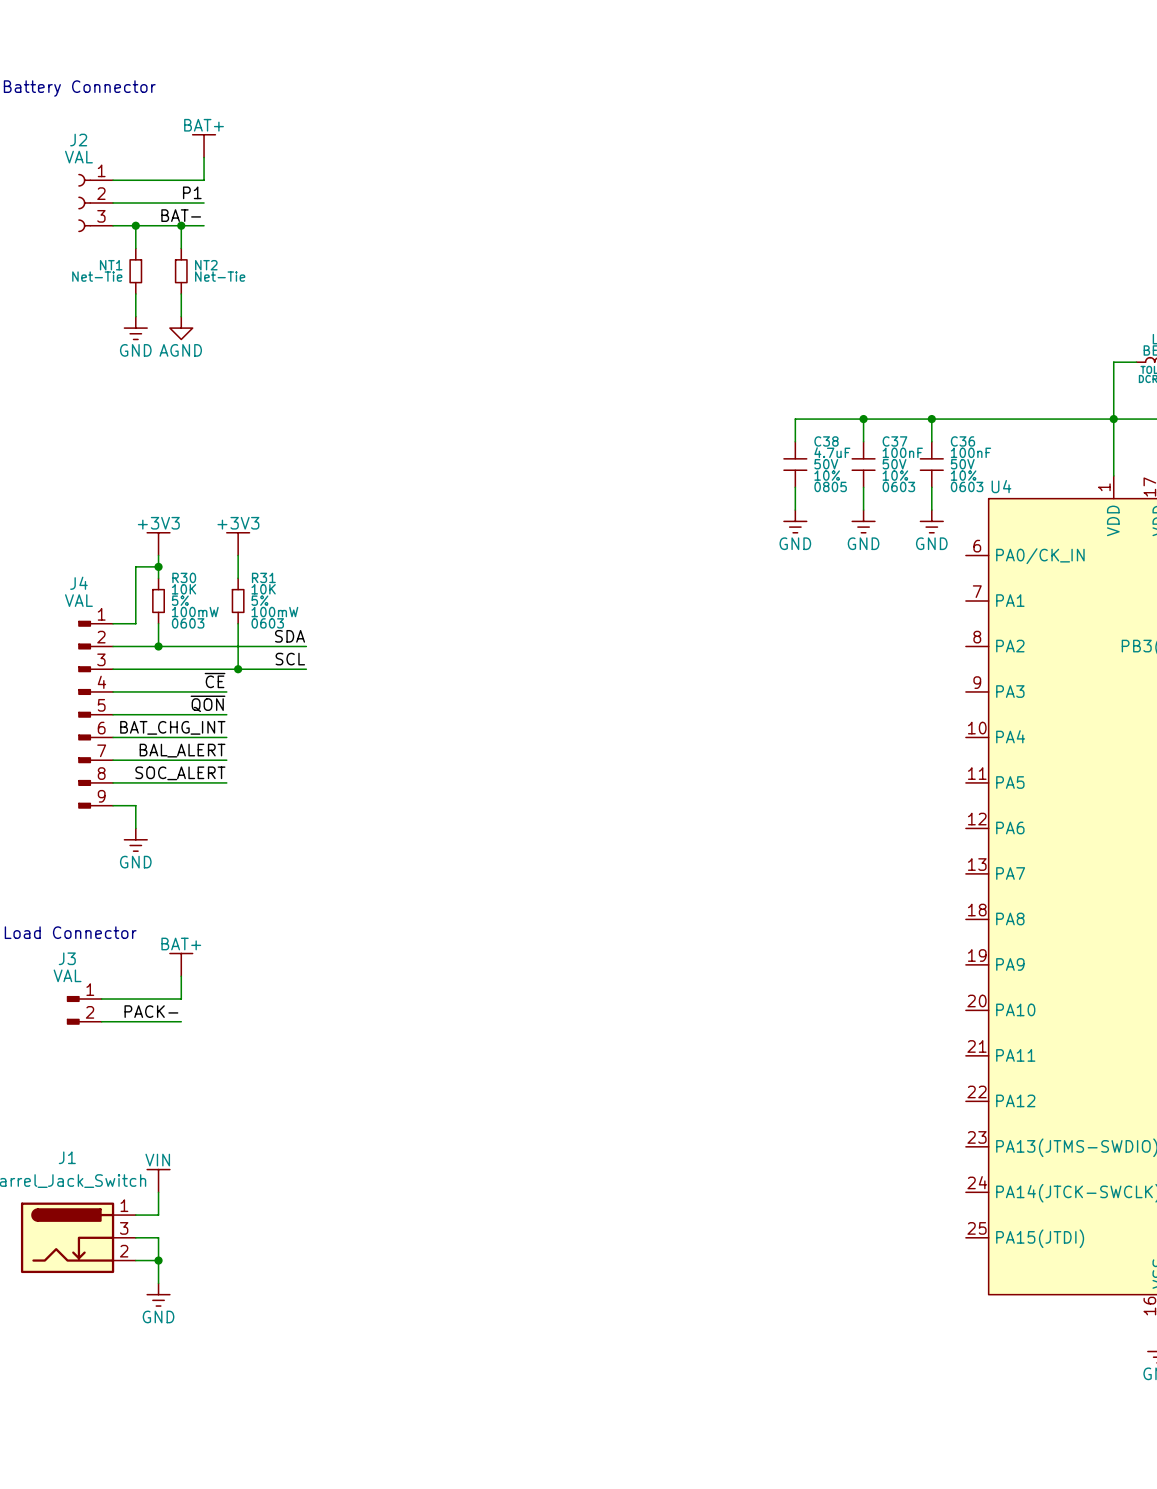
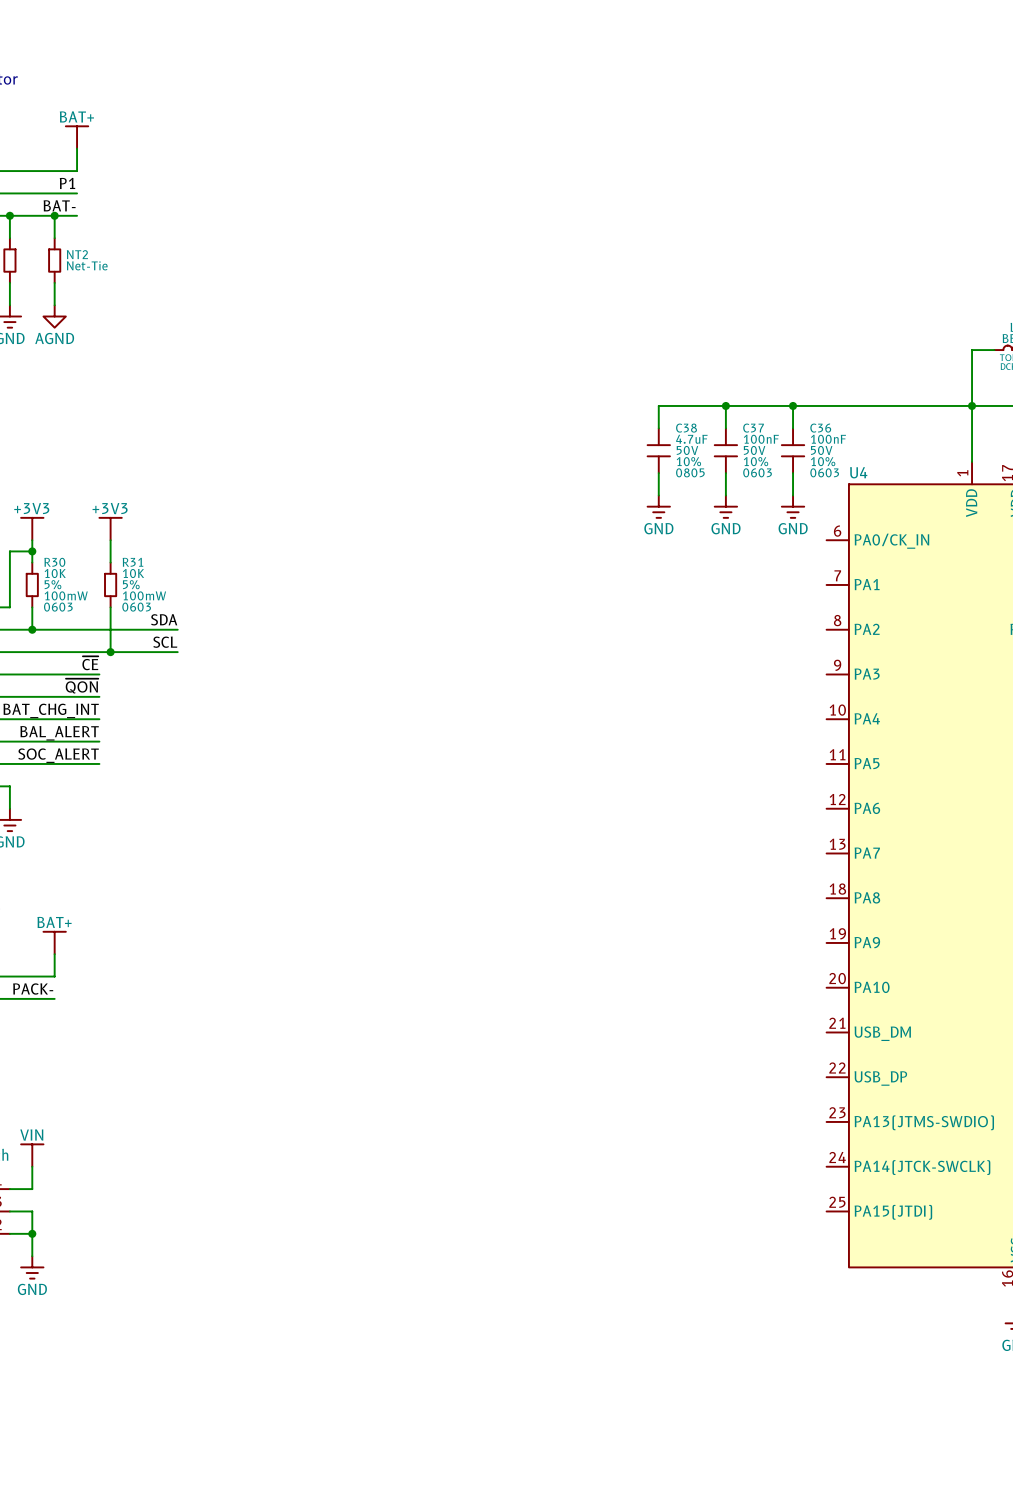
U4 pin name: PA11 (1015, 1055) -> USB_DM (882, 1033)
U4 pin name: PA12 (1015, 1100) -> USB_DP (880, 1078)

